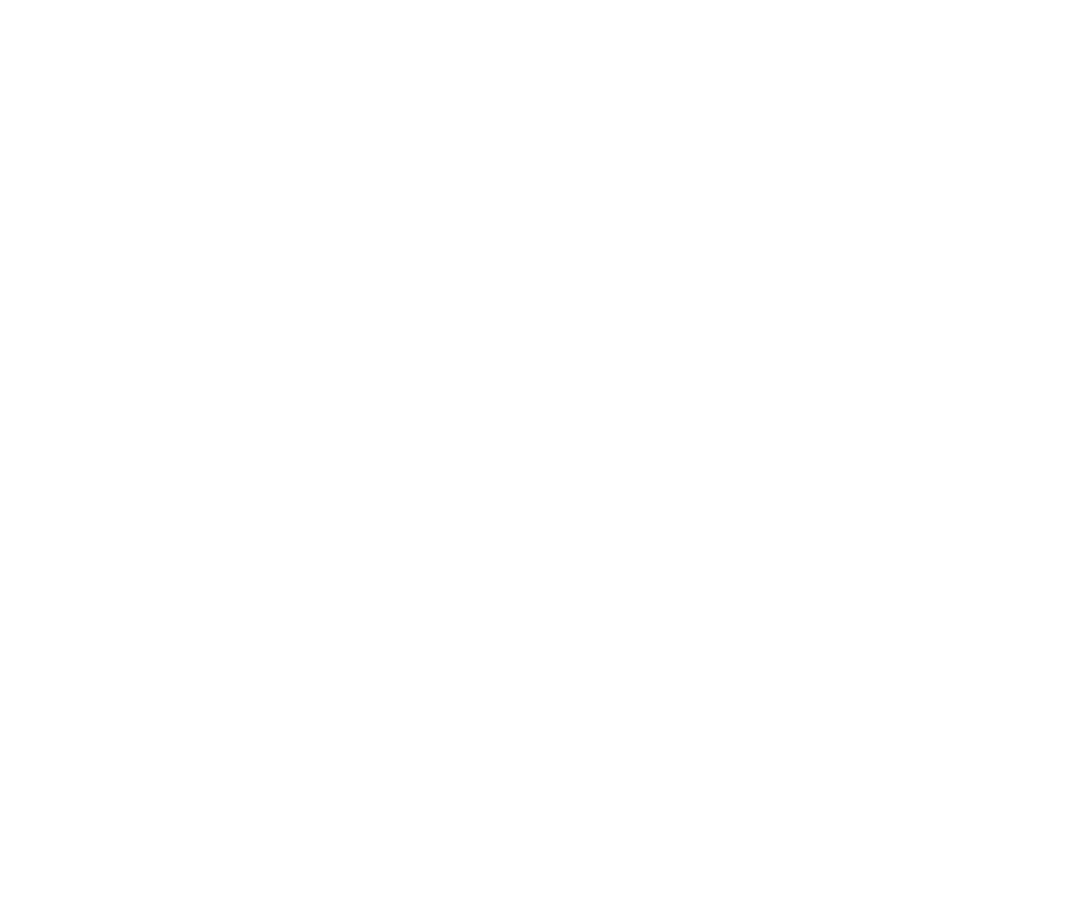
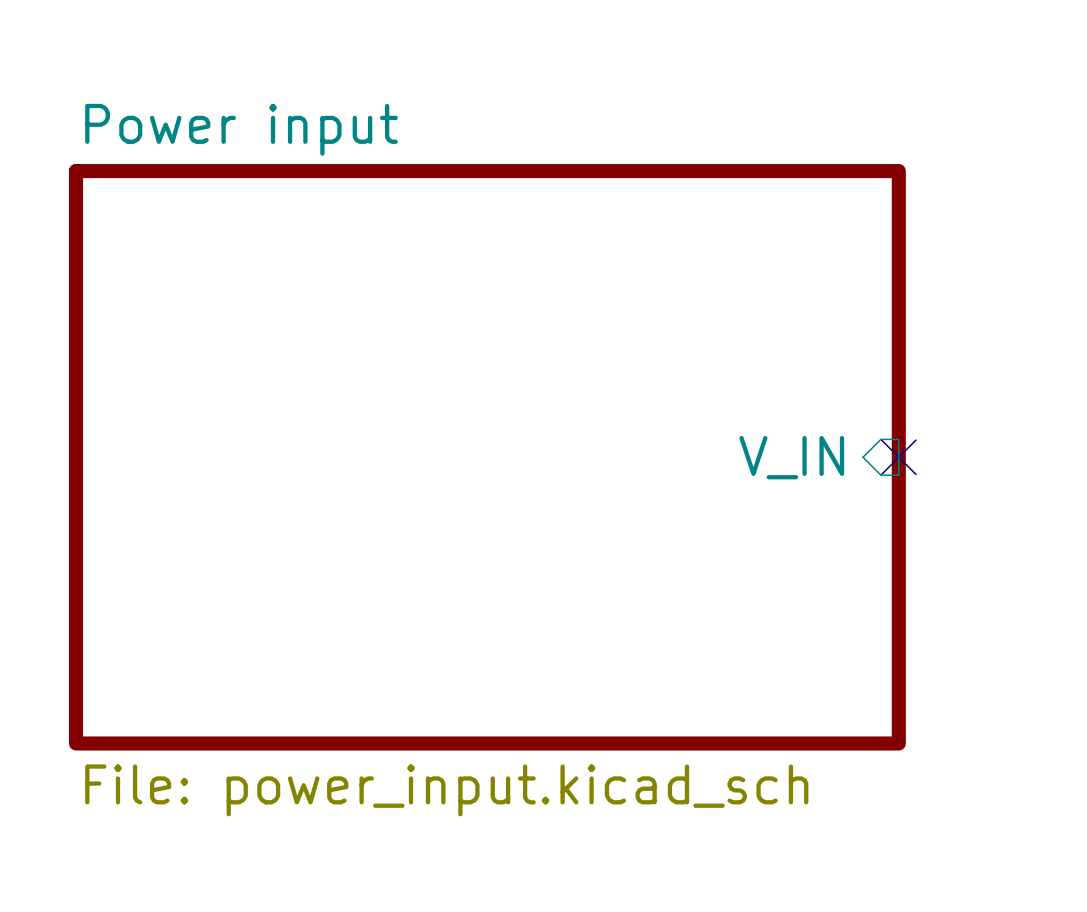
sheet Power input: none -> File: power_input.kicad_sch (487, 457)
sheet pin: none -> V_IN (791, 457)
no-connect mark: none -> (898, 457)

